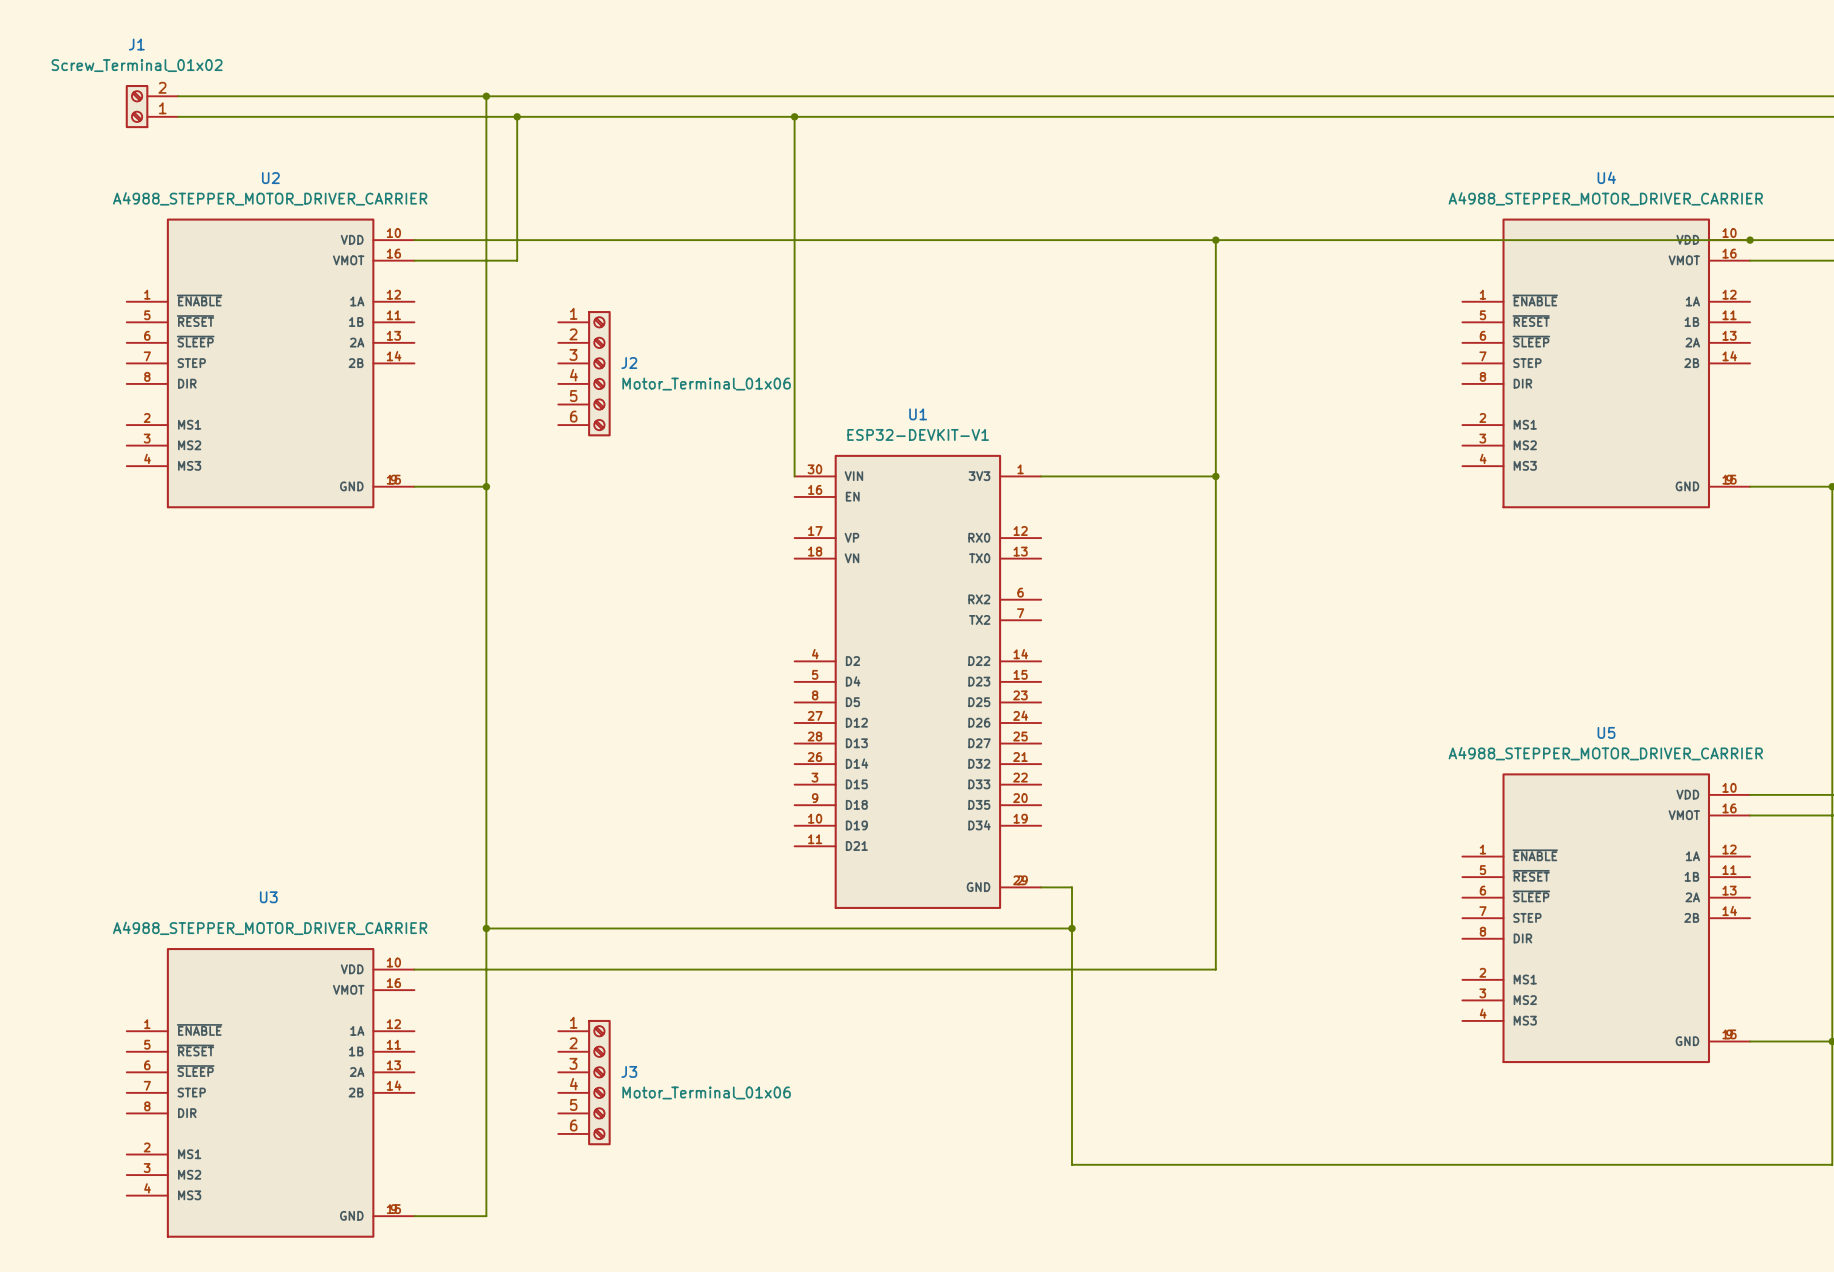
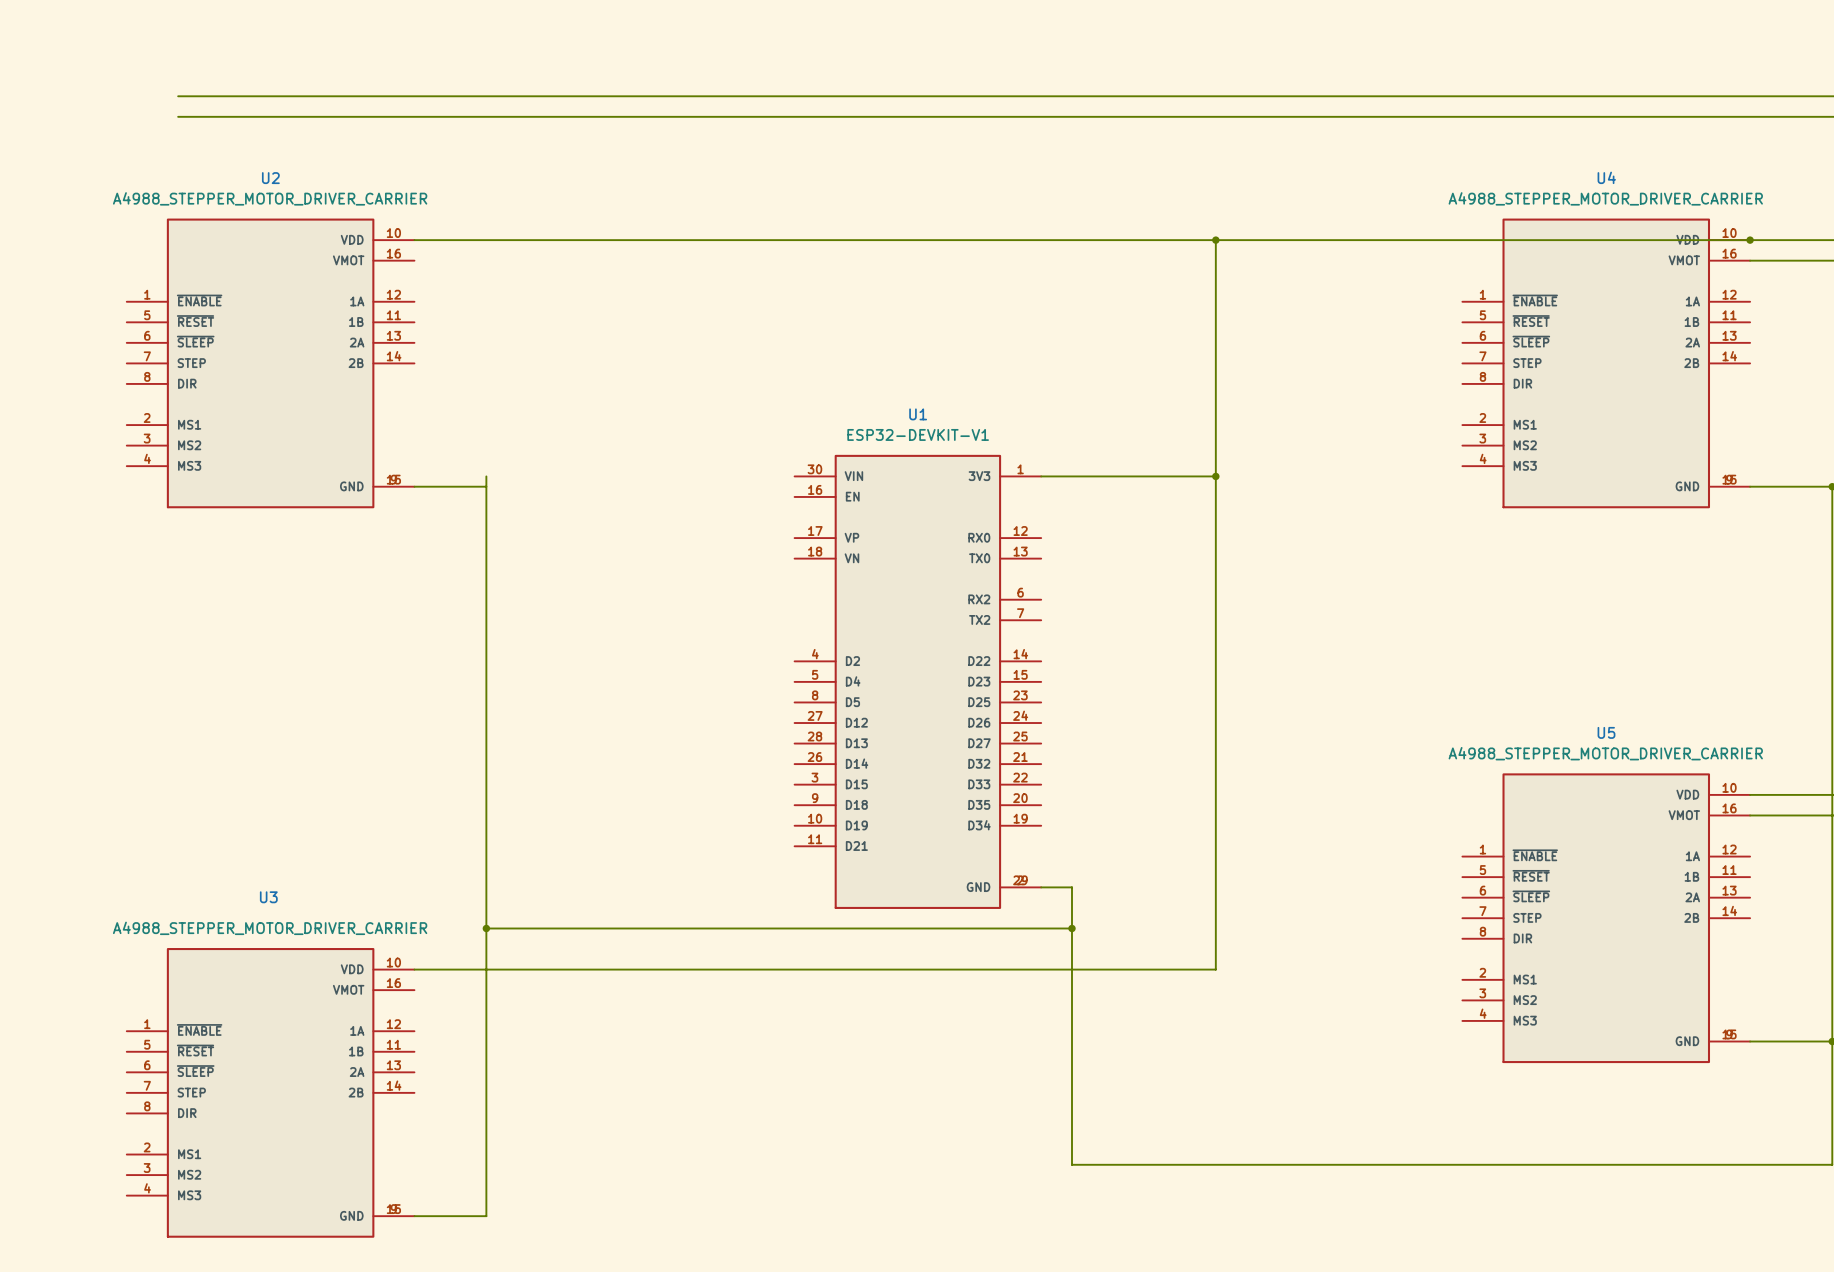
wire: (486, 96) (486, 476) -> none
junction: (486, 96) -> none
J1: Screw_Terminal_01x02 (151, 106) -> none
wire: (517, 116) (517, 260) (414, 260) -> none
junction: (517, 116) -> none
wire: (794, 116) (794, 476) -> none
junction: (794, 116) -> none
J2: Motor_Terminal_01x06 (584, 373) -> none
junction: (486, 486) -> none
J3: Motor_Terminal_01x06 (584, 1082) -> none

